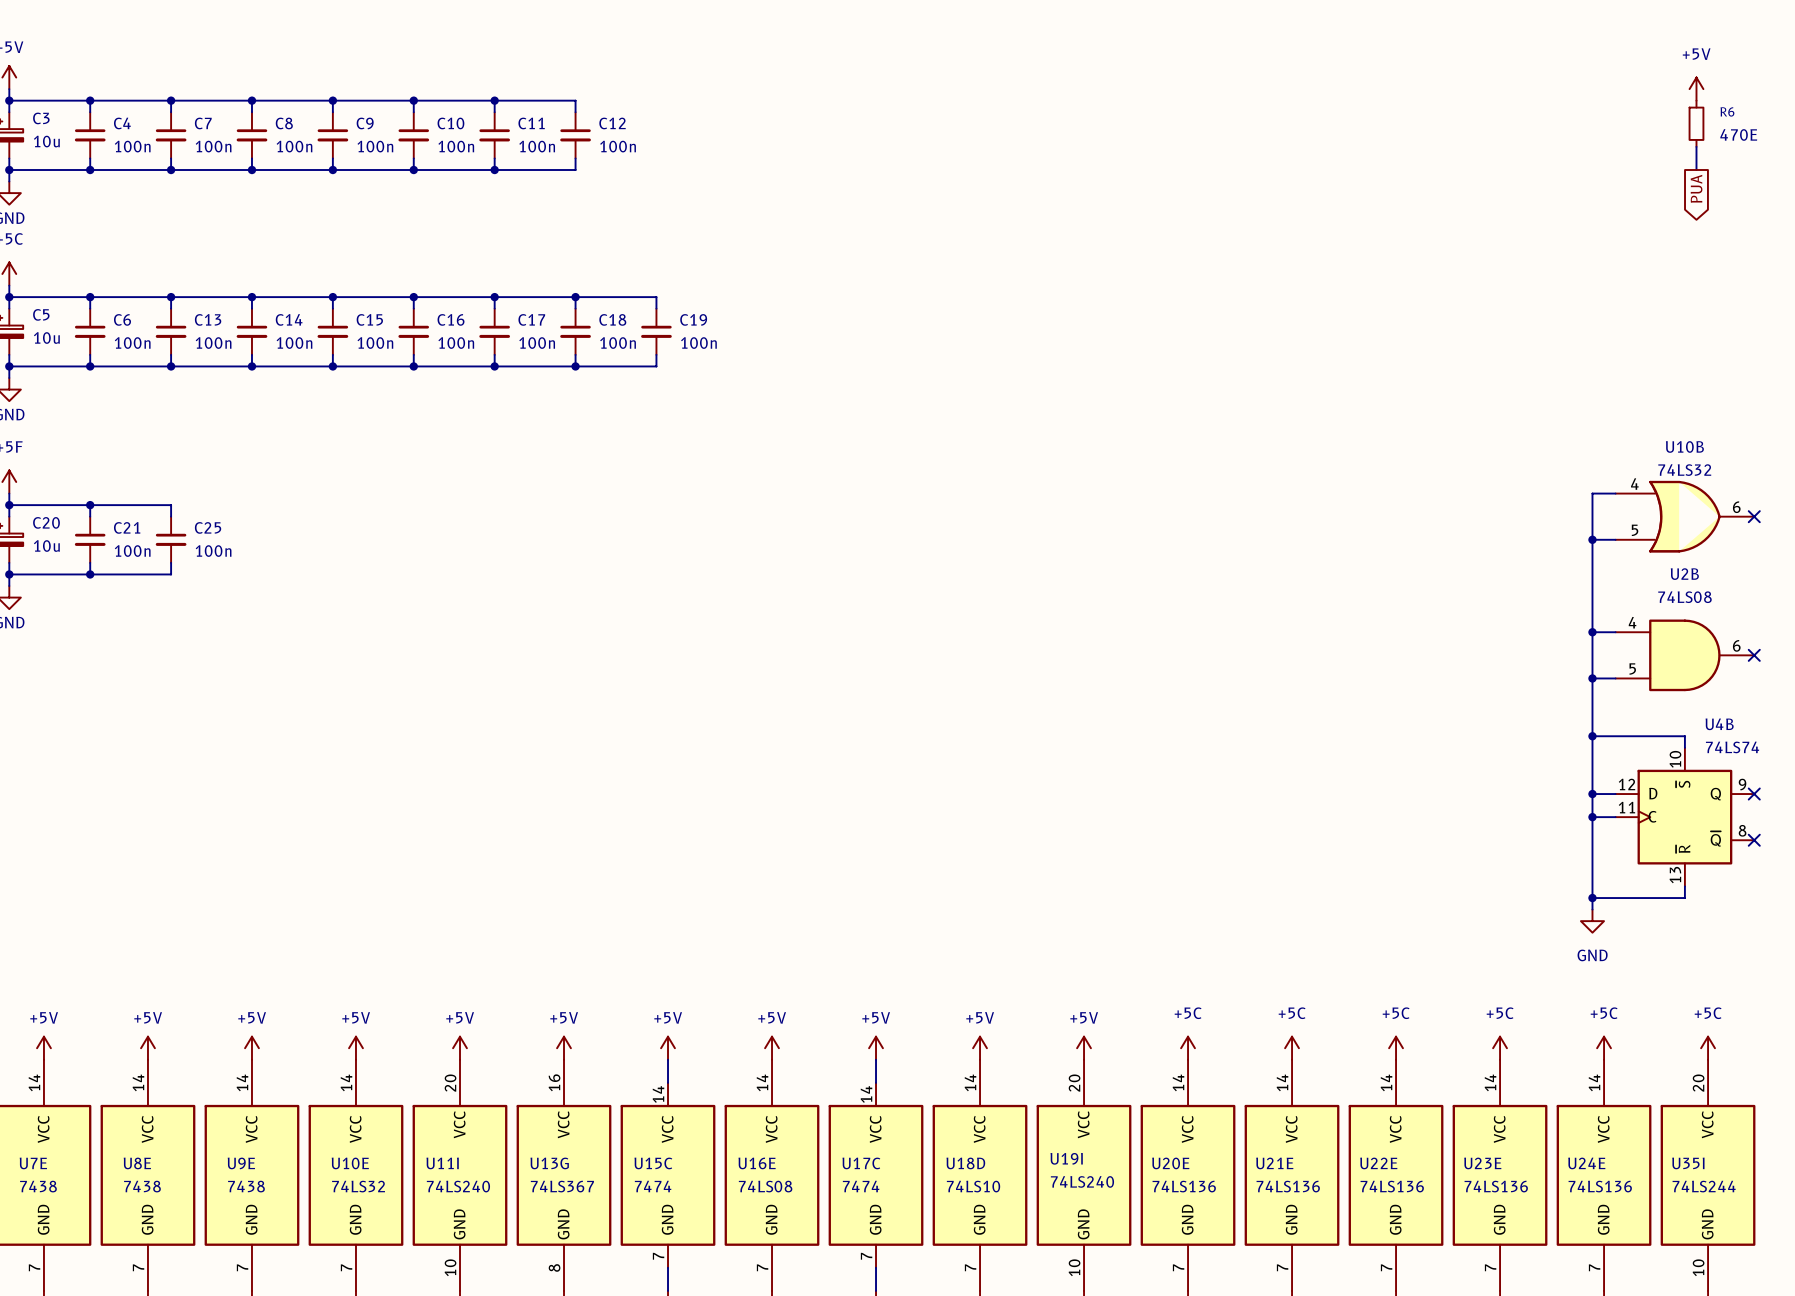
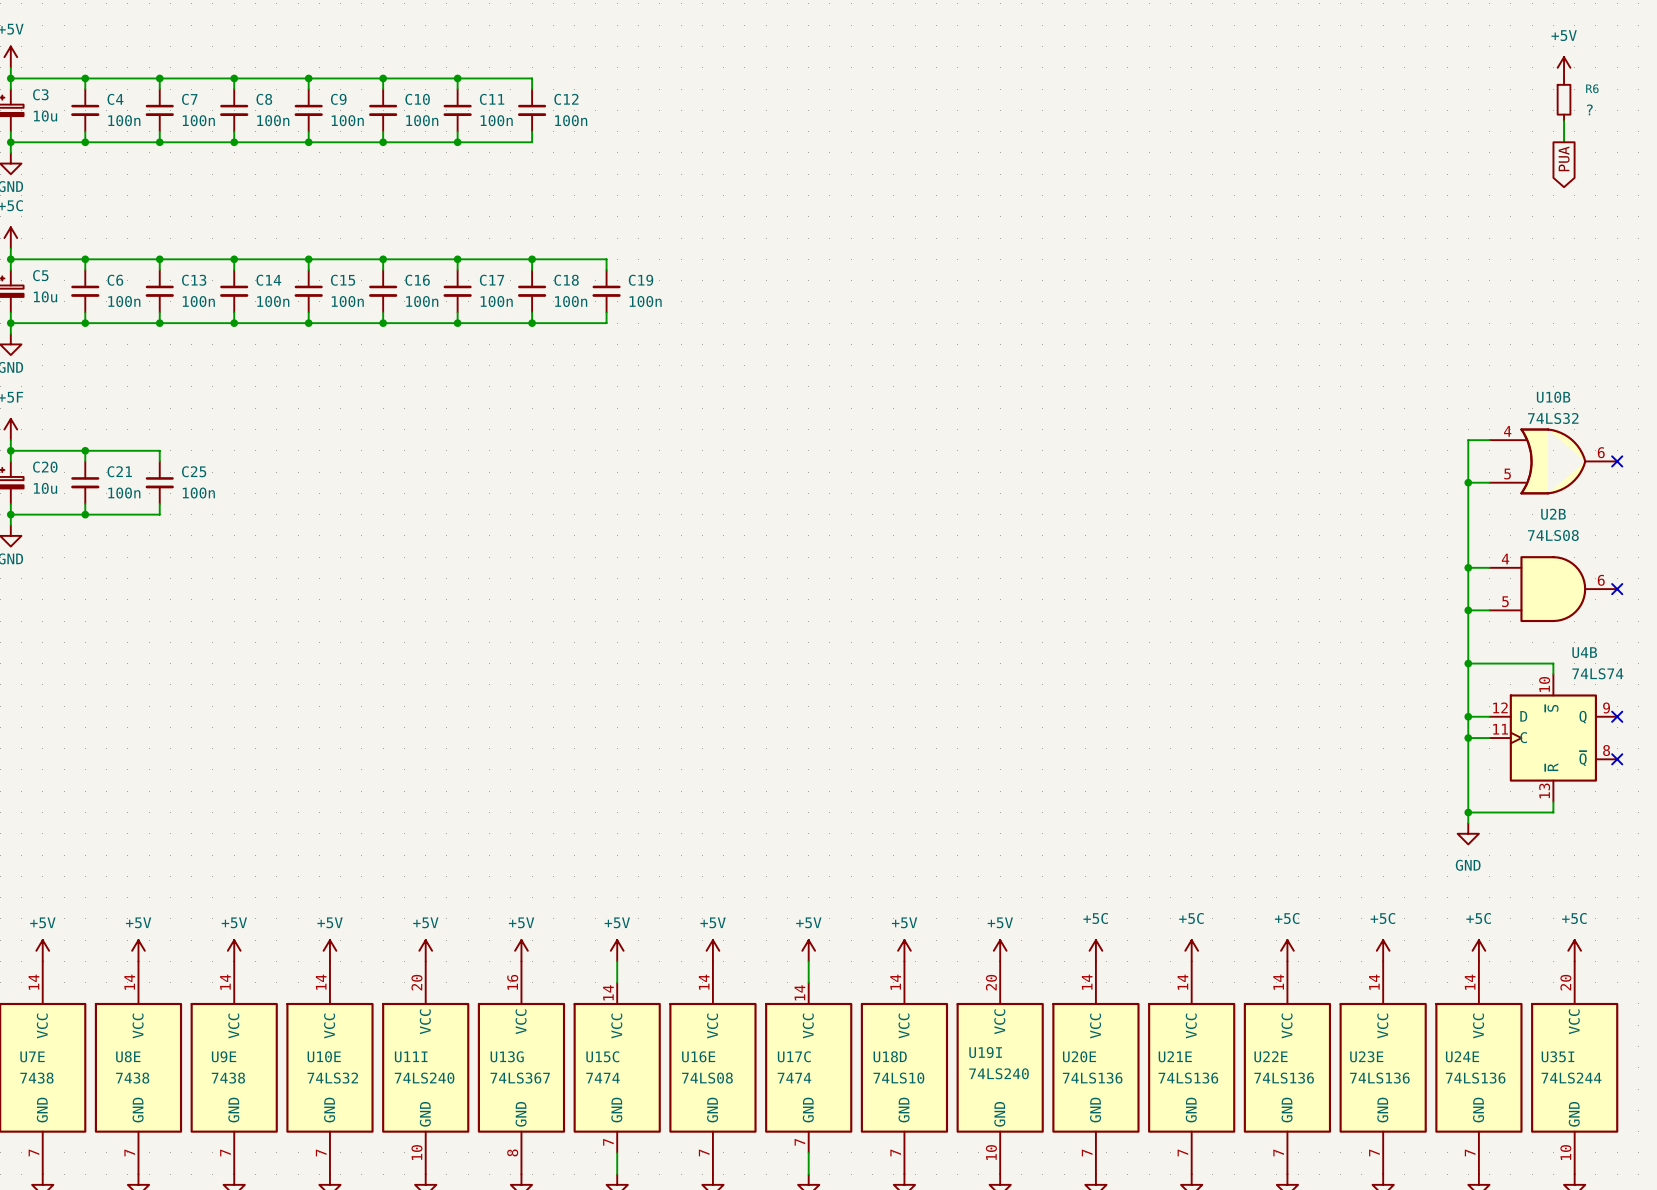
R6 value: 470E (1738, 134) -> ? (1589, 109)

